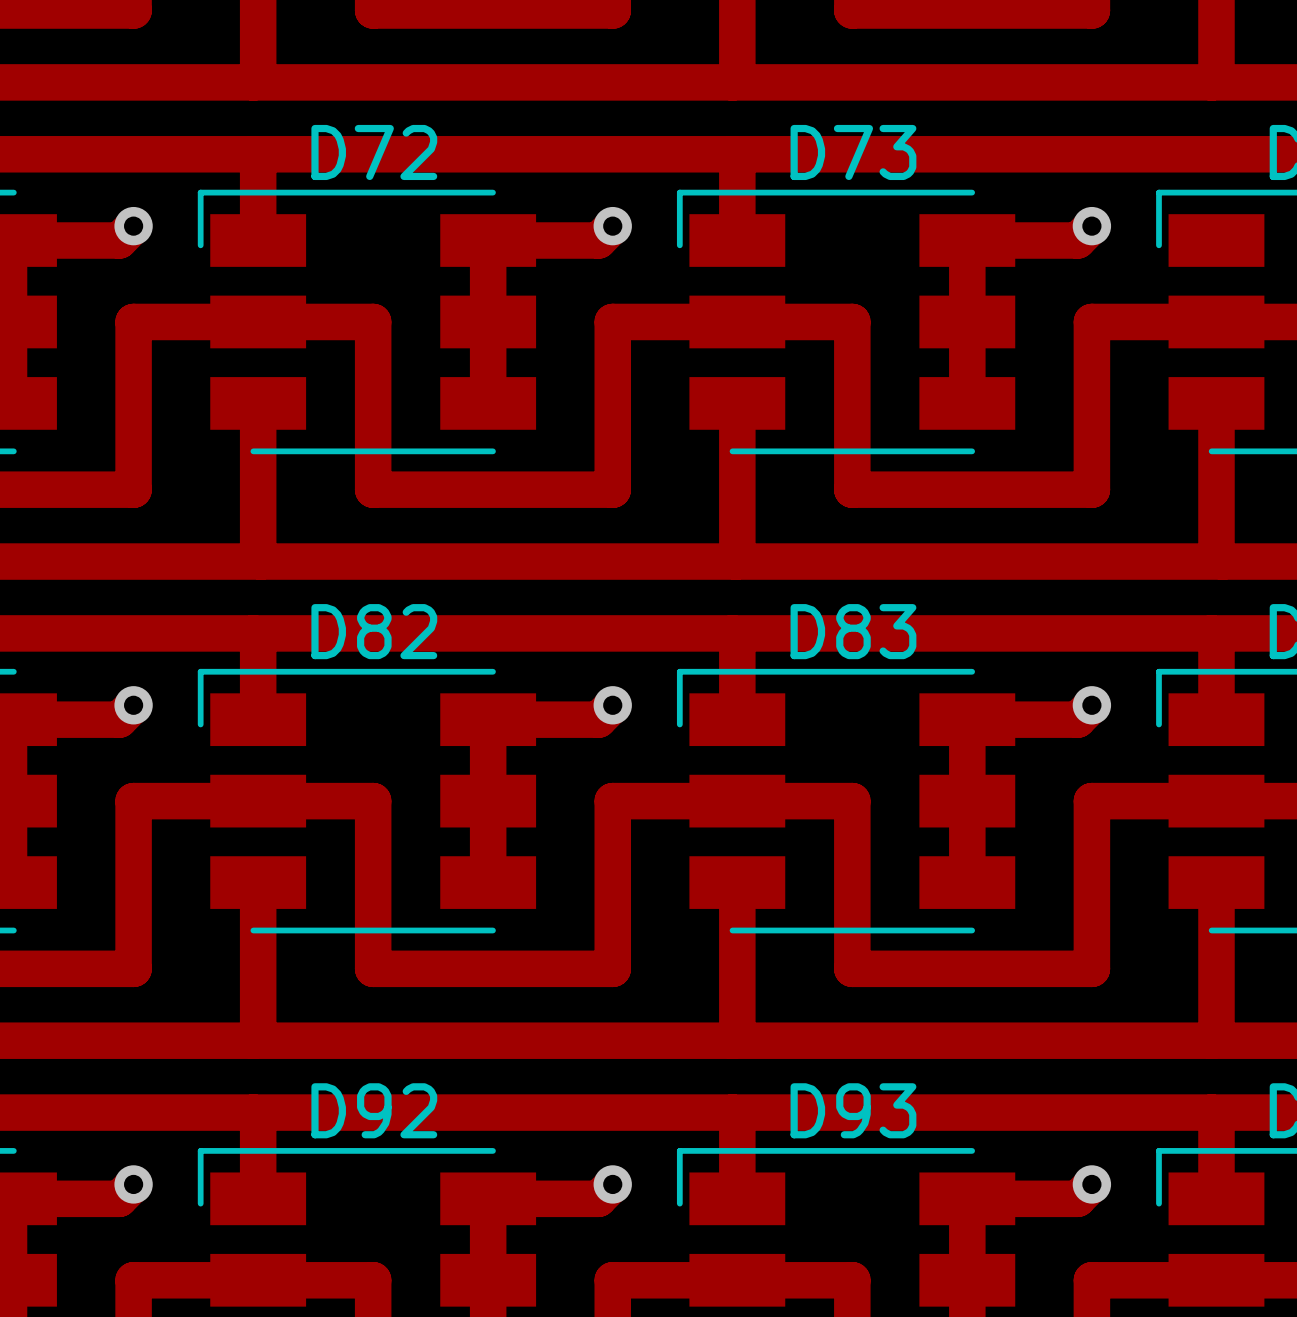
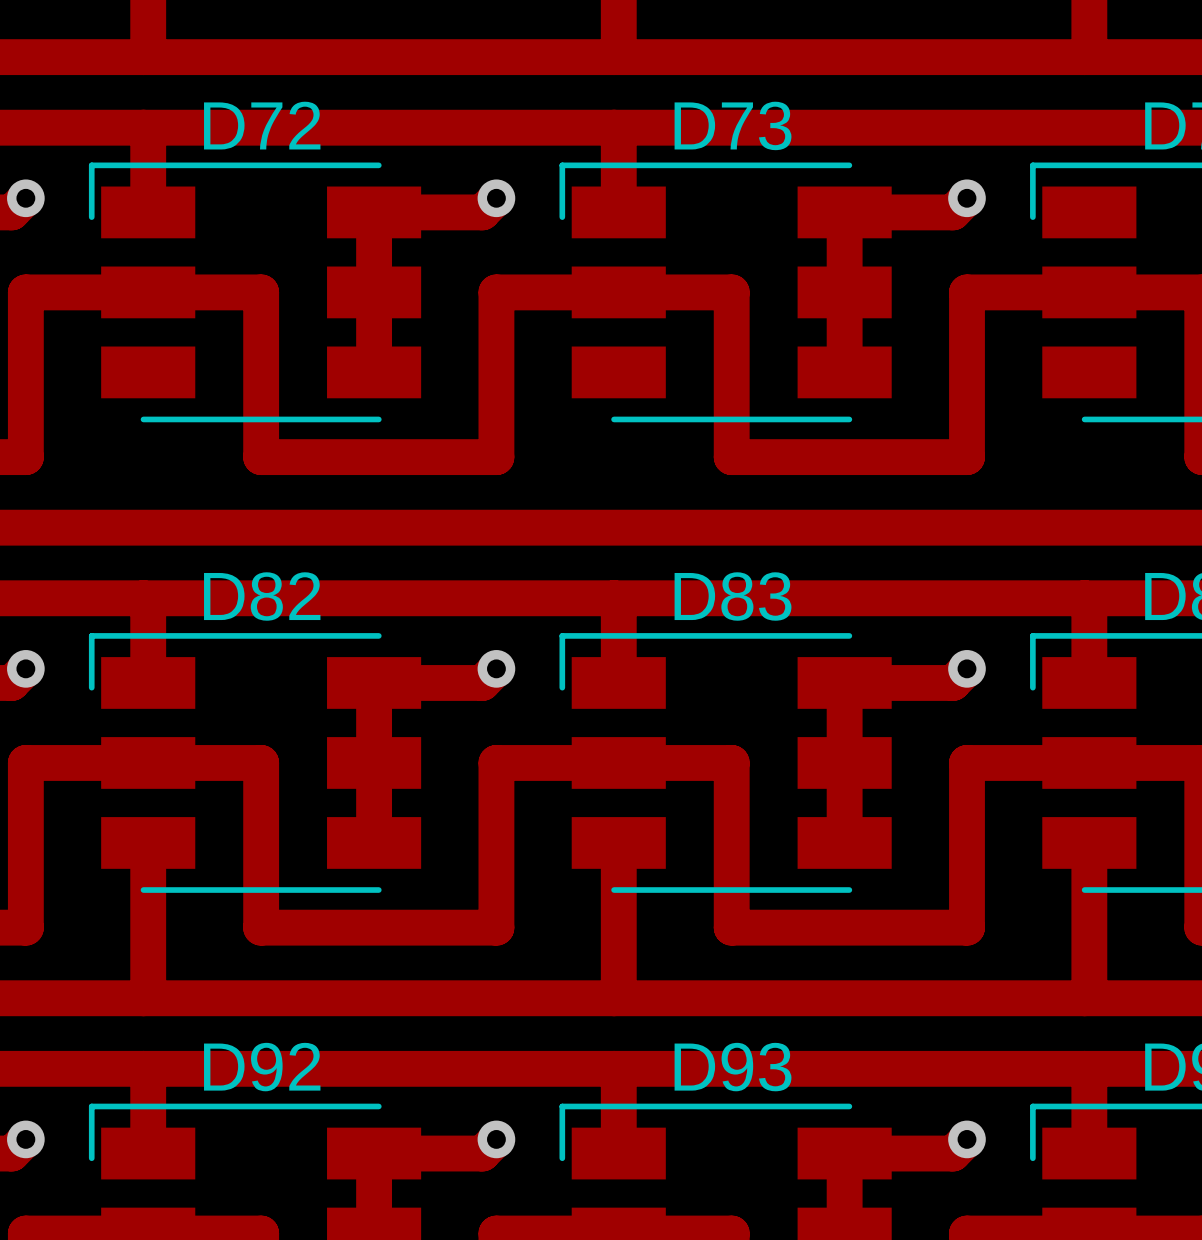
track: (258, 403) (258, 558) (261, 561) -> none
track: (737, 403) (737, 560) (735, 561) -> none
track: (1216, 403) (1216, 555) (1222, 561) -> none

